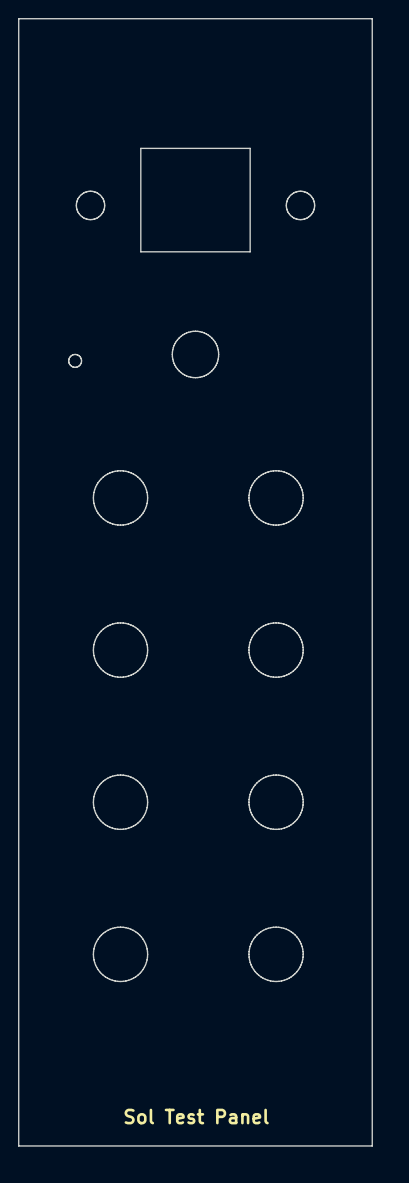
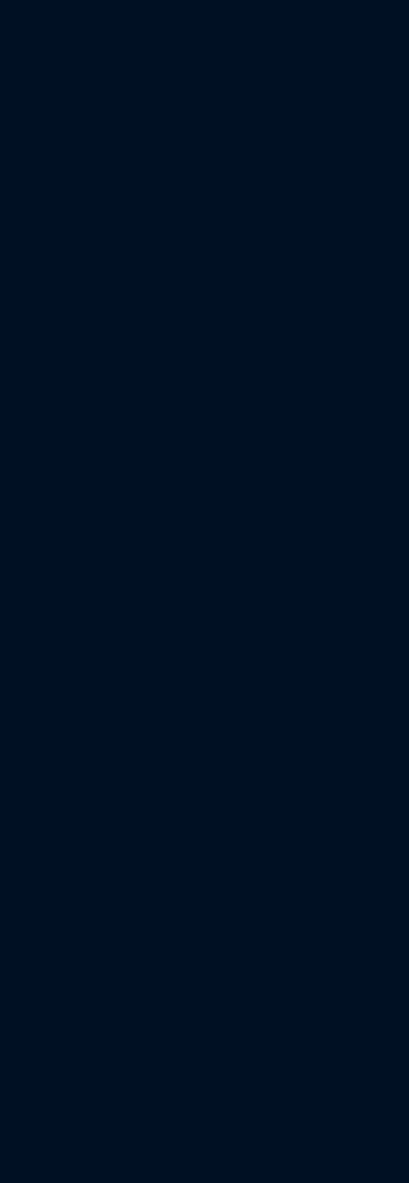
board edge: (18, 18) (372, 18) (372, 1145) (18, 1145) (18, 18) -> none
board edge: (140, 148) (250, 148) (250, 251) (140, 251) (140, 148) -> none
board edge: (90, 191) (80, 195) (76, 205) (80, 215) (90, 219) (100, 215) (104, 205) (100, 195) (90, 191) -> none
board edge: (300, 191) (290, 195) (286, 205) (290, 215) (300, 219) (310, 215) (314, 205) (310, 195) (300, 191) -> none
board edge: (195, 331) (186, 333) (179, 338) (174, 345) (172, 354) (174, 363) (179, 370) (186, 375) (195, 377) (204, 375) (211, 370) (216, 363) (218, 354) (216, 345) (211, 338) (204, 333) (195, 331) -> none
board edge: (75, 354) (70, 356) (68, 360) (70, 365) (75, 367) (79, 365) (81, 360) (79, 356) (75, 354) -> none
board edge: (120, 470) (109, 472) (101, 478) (95, 487) (93, 497) (95, 508) (101, 517) (110, 523) (120, 525) (130, 523) (139, 517) (145, 508) (147, 497) (145, 487) (139, 478) (131, 472) (120, 470) -> none
board edge: (276, 470) (265, 472) (256, 478) (251, 487) (248, 497) (251, 508) (256, 517) (265, 523) (276, 525) (286, 523) (295, 517) (301, 508) (303, 497) (301, 487) (295, 478) (286, 472) (276, 470) -> none
board edge: (120, 622) (110, 624) (101, 630) (95, 639) (93, 650) (95, 660) (101, 669) (109, 675) (120, 677) (131, 675) (139, 669) (145, 660) (147, 650) (145, 639) (139, 630) (130, 624) (120, 622) -> none
board edge: (276, 622) (265, 624) (256, 630) (251, 639) (248, 650) (251, 660) (256, 669) (265, 675) (276, 677) (286, 675) (295, 669) (301, 660) (303, 650) (301, 639) (295, 630) (286, 624) (276, 622) -> none
board edge: (120, 775) (109, 777) (101, 782) (95, 791) (93, 802) (95, 812) (101, 821) (109, 827) (120, 829) (131, 827) (139, 821) (145, 812) (147, 802) (145, 791) (139, 782) (131, 777) (120, 775) -> none
board edge: (276, 775) (265, 777) (256, 782) (251, 791) (248, 802) (251, 812) (256, 821) (265, 827) (276, 829) (286, 827) (295, 821) (301, 812) (303, 802) (301, 791) (295, 782) (286, 777) (276, 775) -> none
board edge: (120, 927) (110, 929) (101, 935) (95, 943) (93, 954) (95, 964) (101, 973) (109, 979) (120, 981) (131, 979) (139, 973) (145, 964) (147, 954) (145, 943) (139, 935) (130, 929) (120, 927) -> none
board edge: (276, 927) (265, 929) (256, 935) (251, 943) (248, 954) (251, 964) (256, 973) (265, 979) (276, 981) (286, 979) (295, 973) (301, 964) (303, 954) (301, 943) (295, 935) (286, 929) (276, 927) -> none
text: Sol Test Panel (196, 1116) -> none

